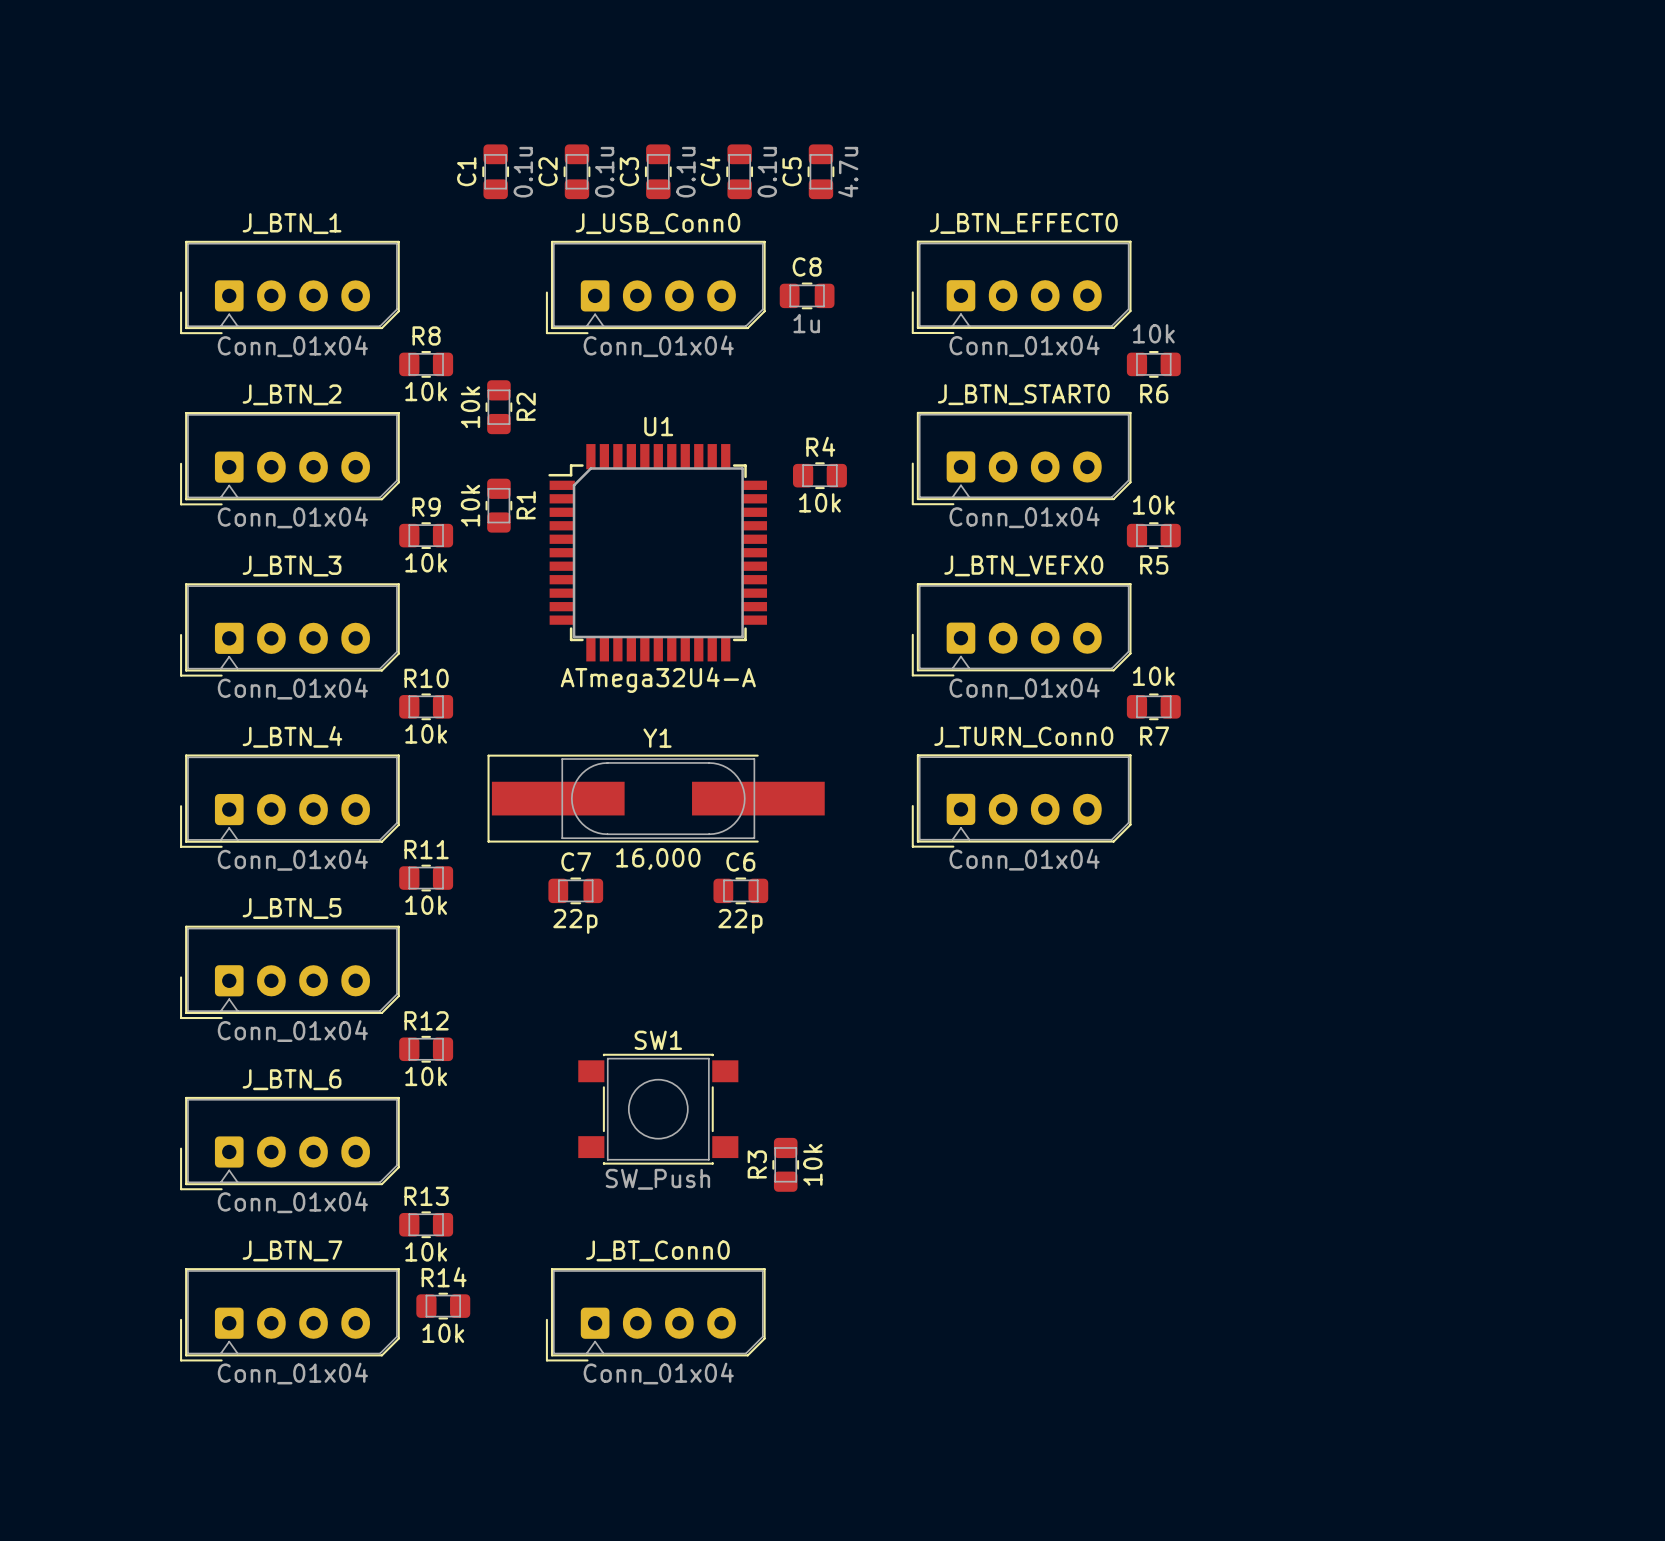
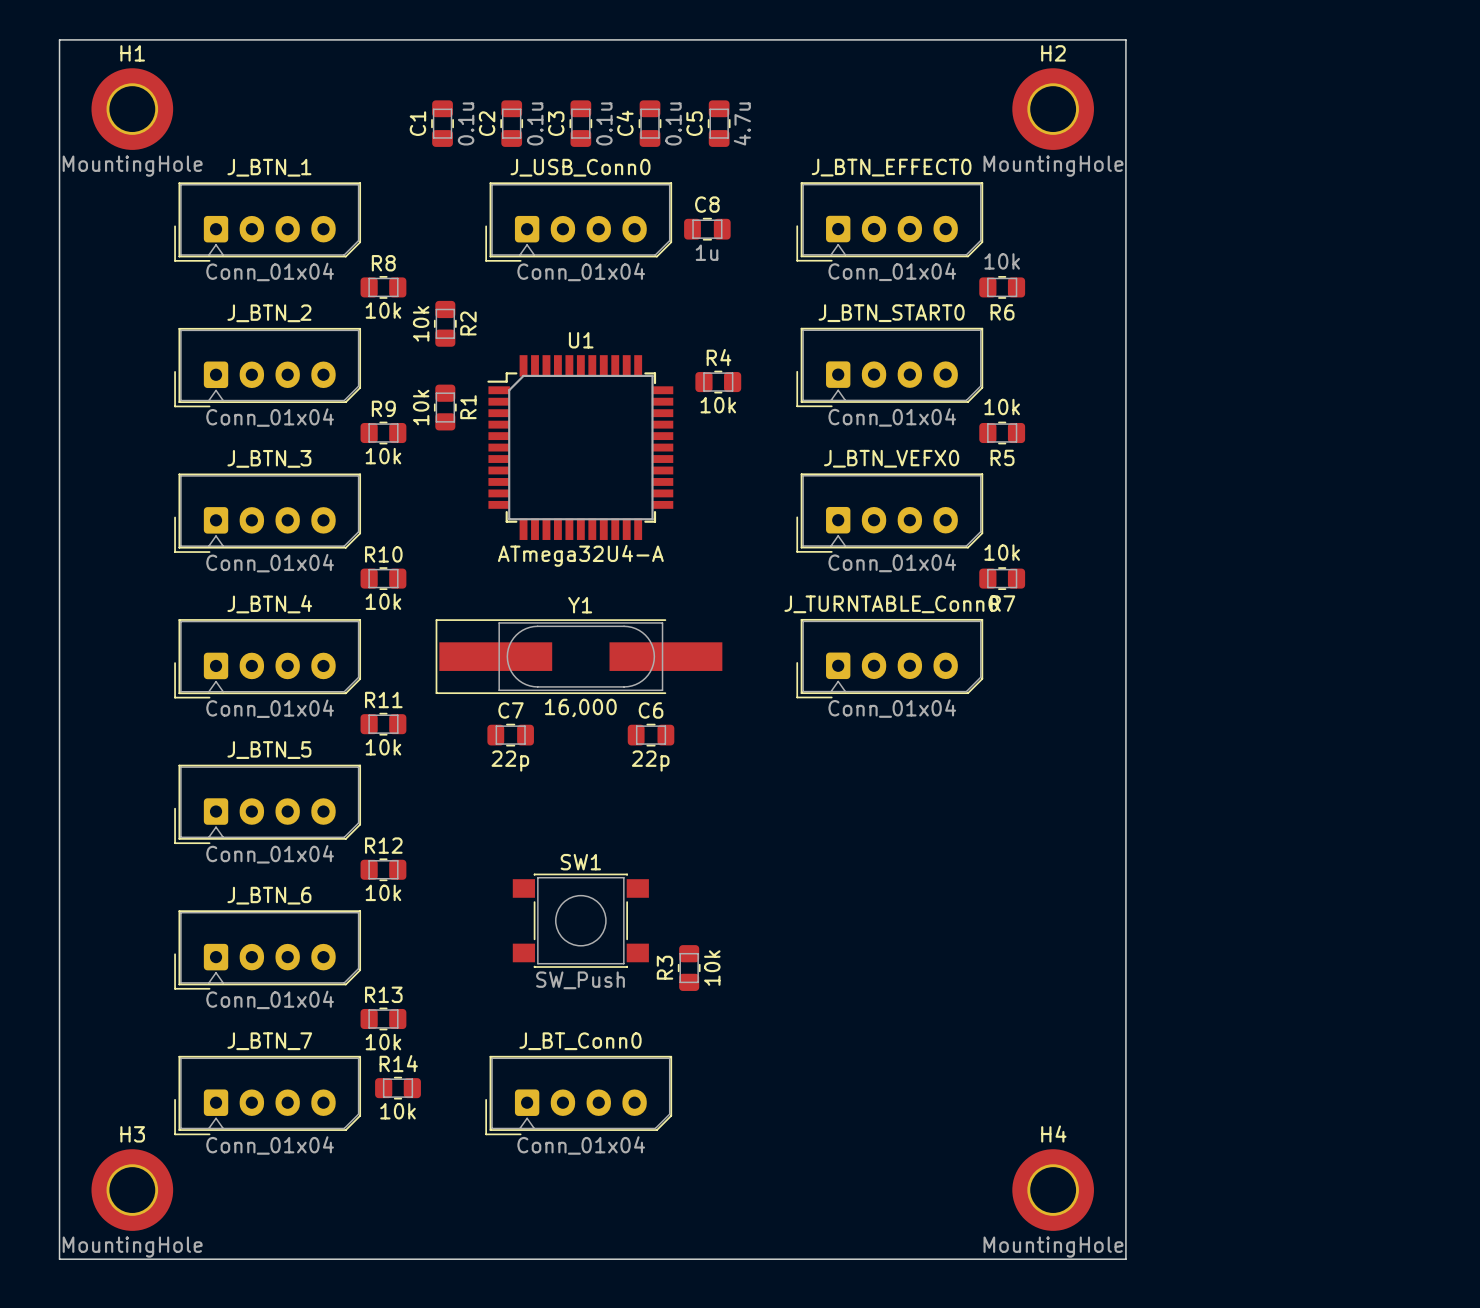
board edge: none -> (59, 39) (1125, 39) (1125, 1259) (59, 1259) (59, 39)
H1: none -> MountingHole (132, 109)
H2: none -> MountingHole (1053, 109)
J_TURN_Conn0 name: J_TURN_Conn0 (1023, 737) -> J_TURNTABLE_Conn0 (891, 604)
H3: none -> MountingHole (132, 1190)
H4: none -> MountingHole (1053, 1190)

